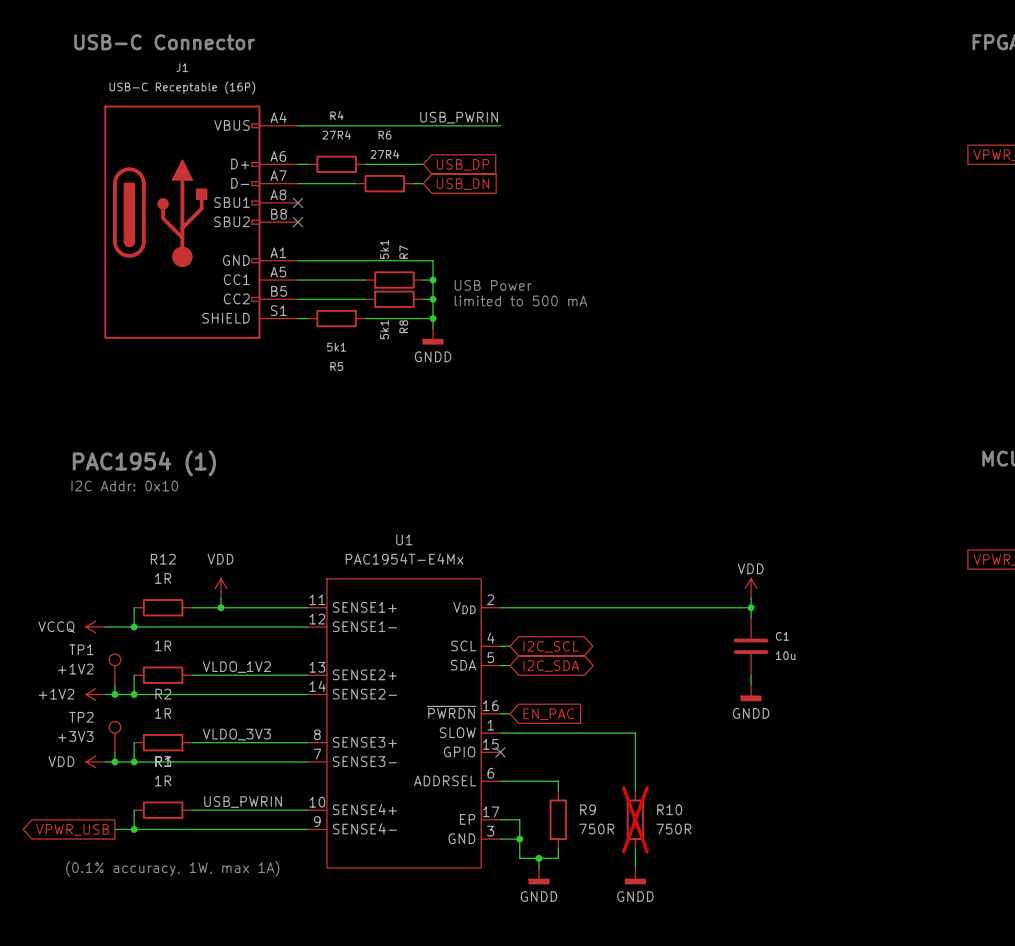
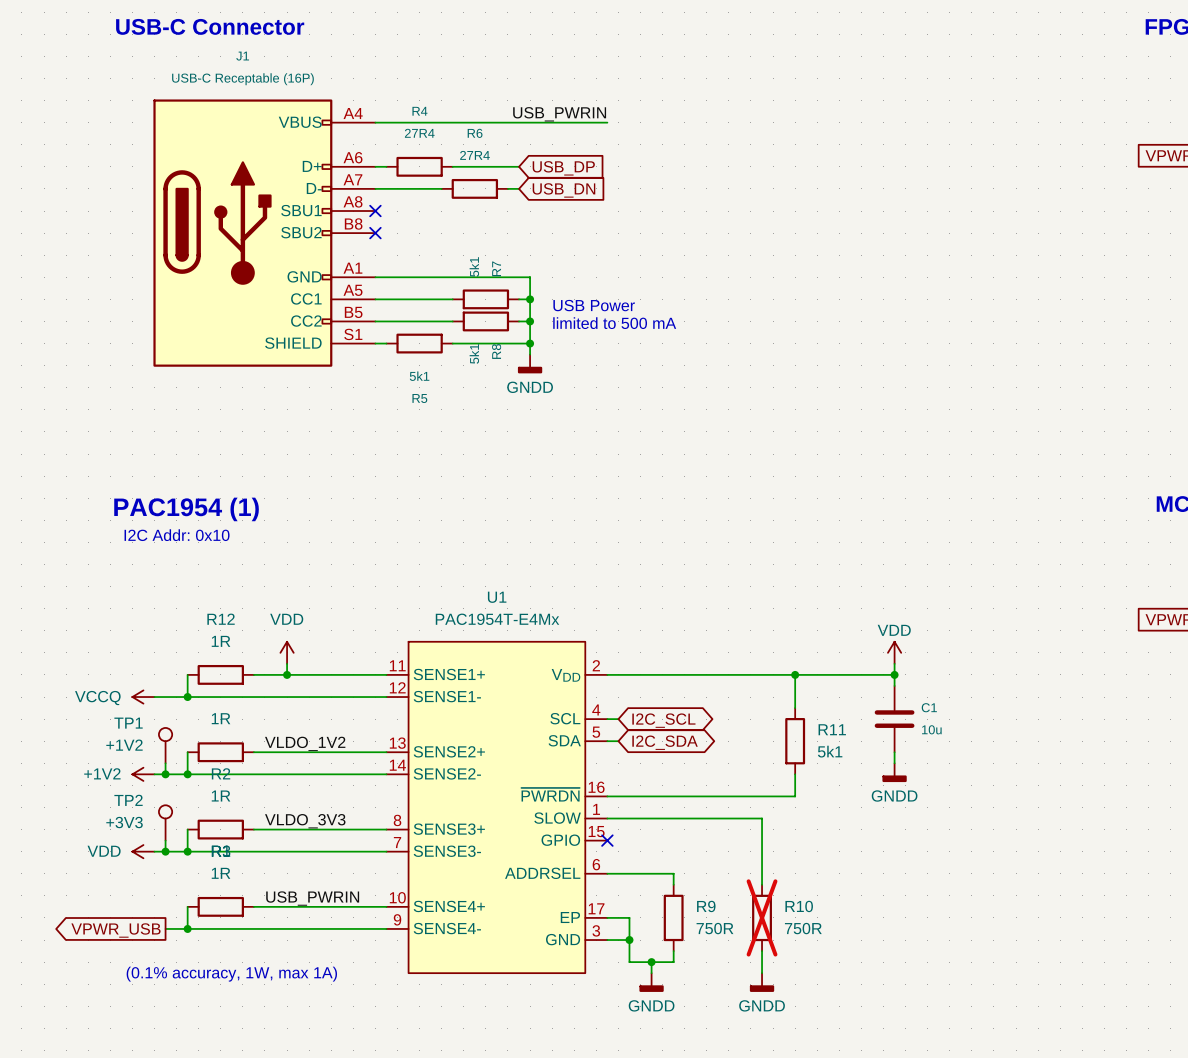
wire: none -> (795, 674) (795, 708)
junction: none -> (795, 674)
R11: none -> 5k1 (795, 741)
wire: none -> (795, 774) (795, 796) (618, 796)
global label: EN_PAC (548, 714) -> none

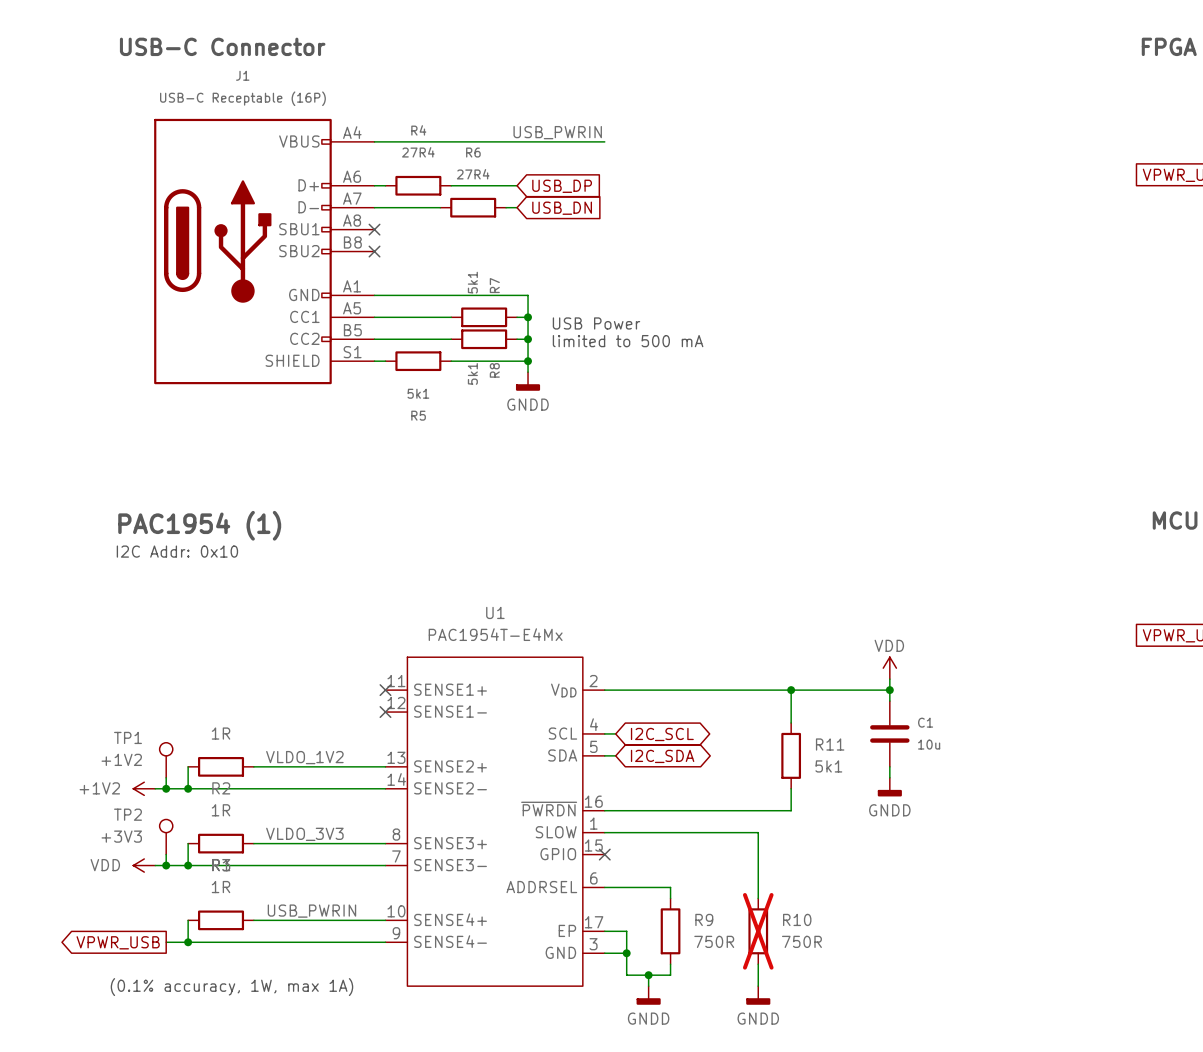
power symbol: VDD (287, 652) -> none
wire: (287, 663) (287, 674) -> none
wire: (187, 674) (187, 697) -> none
R12: 1R (220, 674) -> none
wire: (253, 674) (386, 674) -> none
junction: (287, 674) -> none
no-connect mark: none -> (385, 690)
power symbol: VCCQ (143, 697) -> none
wire: (154, 697) (386, 697) -> none
junction: (187, 697) -> none
no-connect mark: none -> (385, 712)

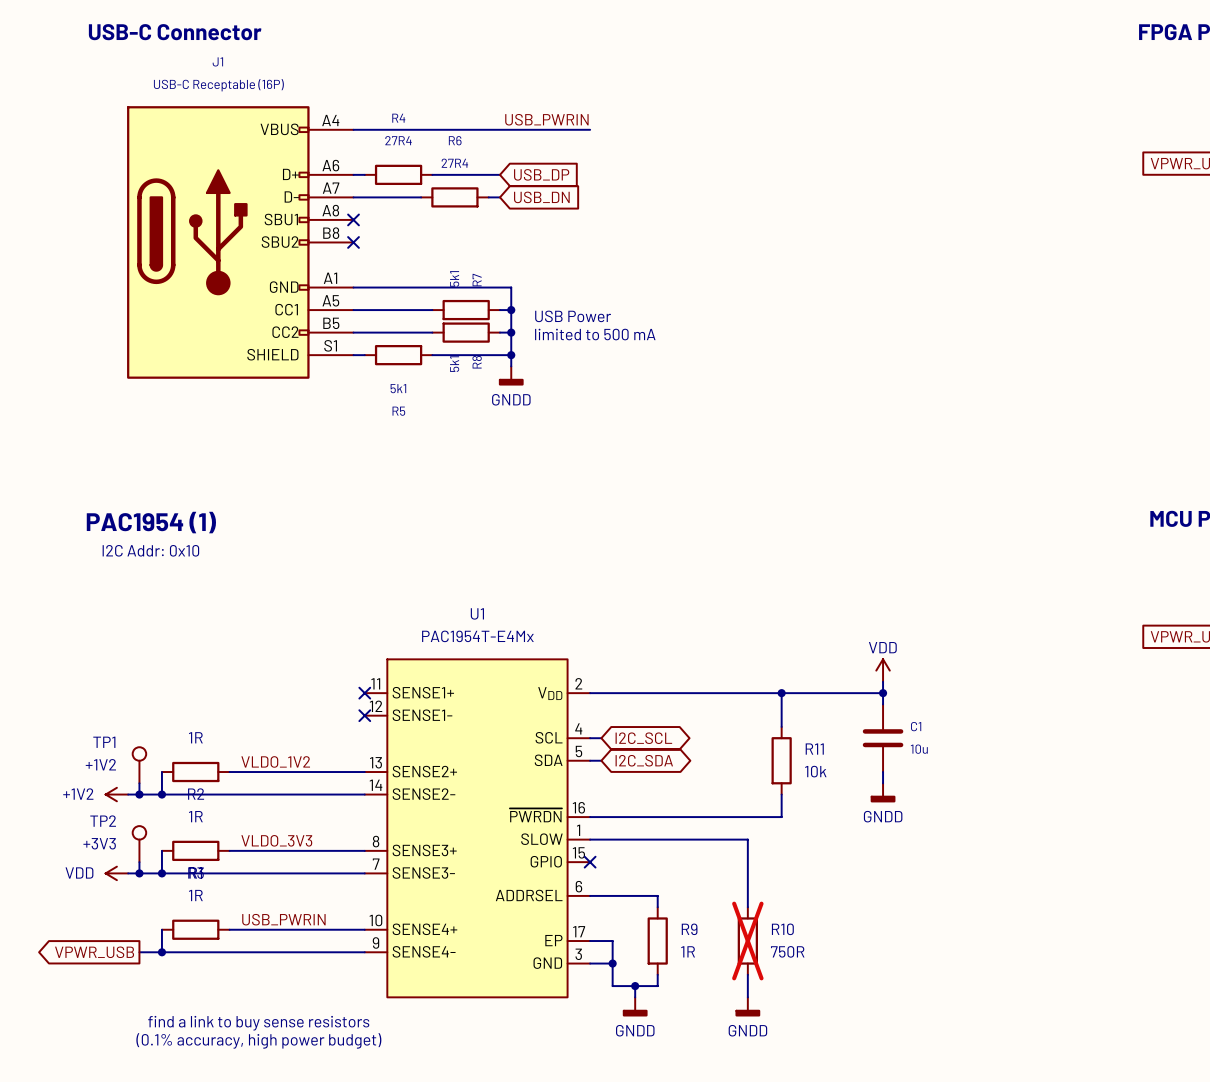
R11 value: 5k1 (828, 766) -> 10k (815, 771)
R9 value: 750R (714, 941) -> 1R (688, 951)
text: (0.1% accuracy, 1W, max 1A) (231, 987) -> none
text: none -> find a link to buy sense resistors (258, 1023)
text: none -> (0.1% accuracy, high power budget) (258, 1040)

